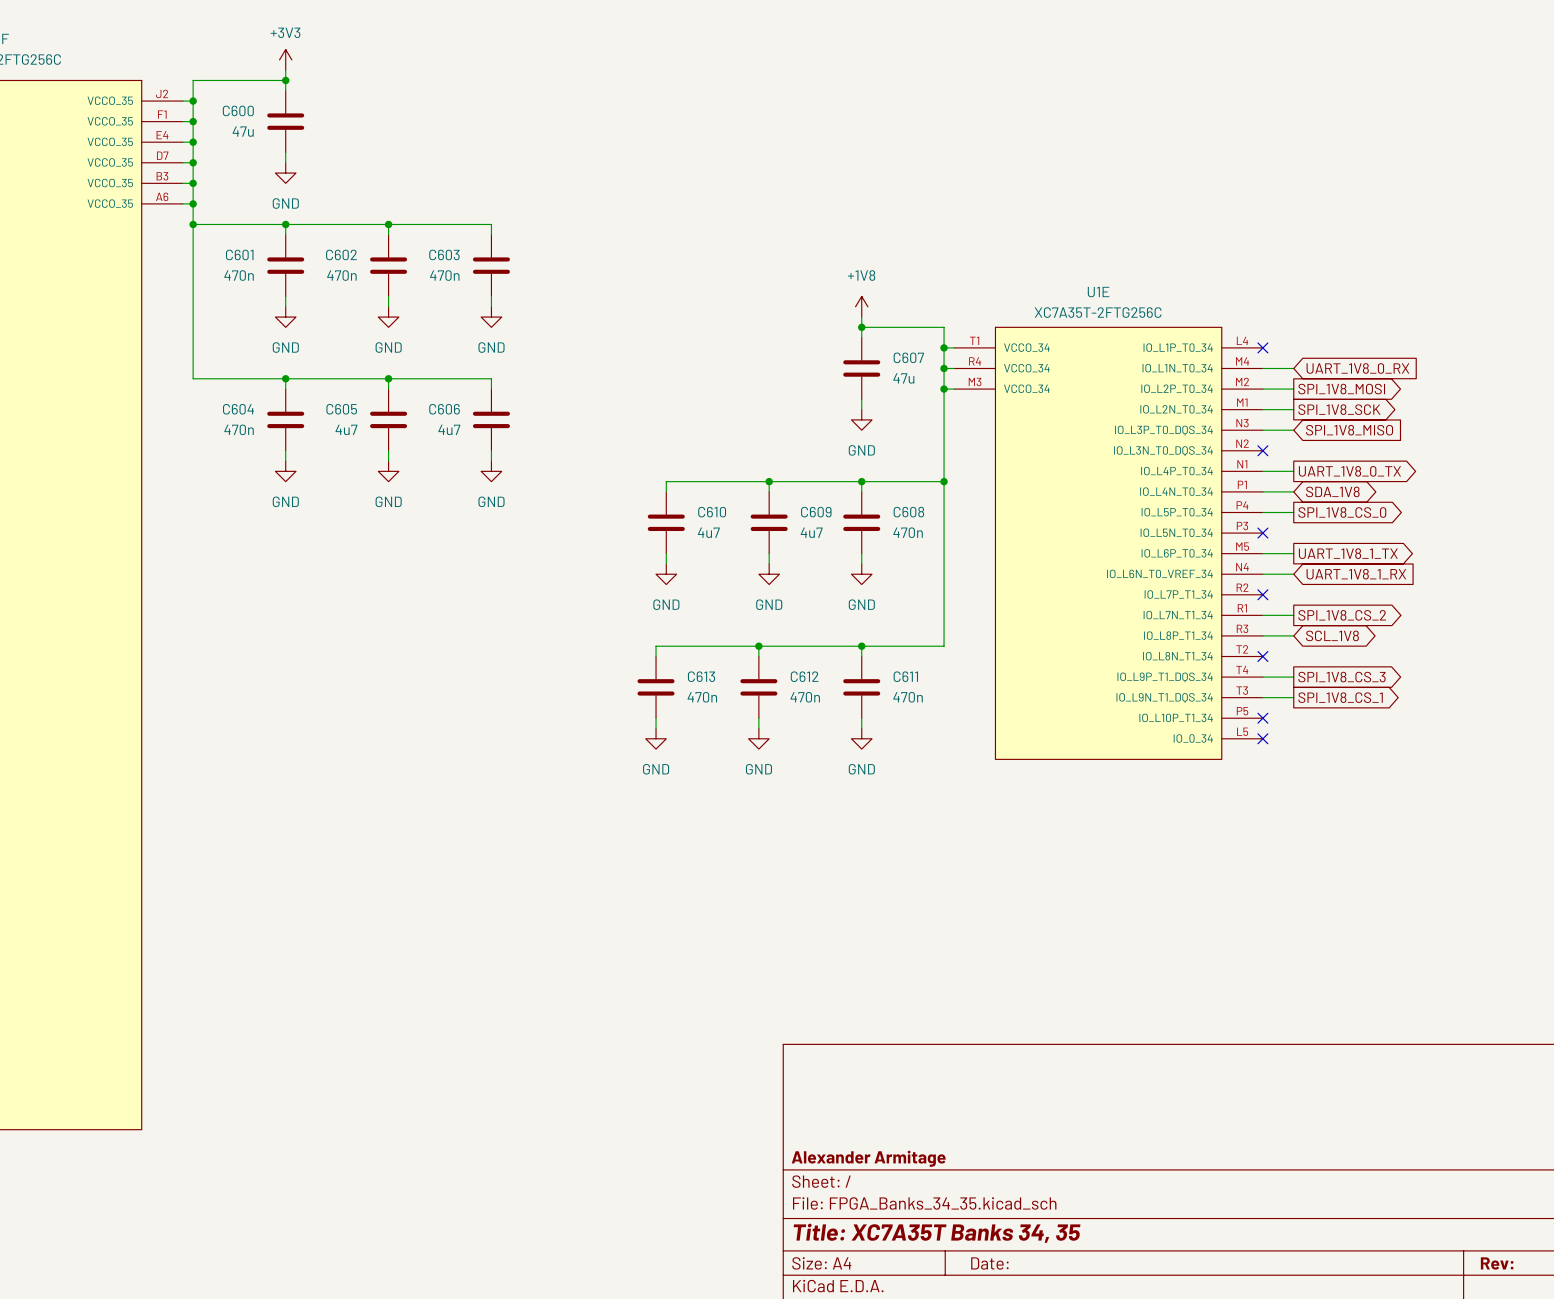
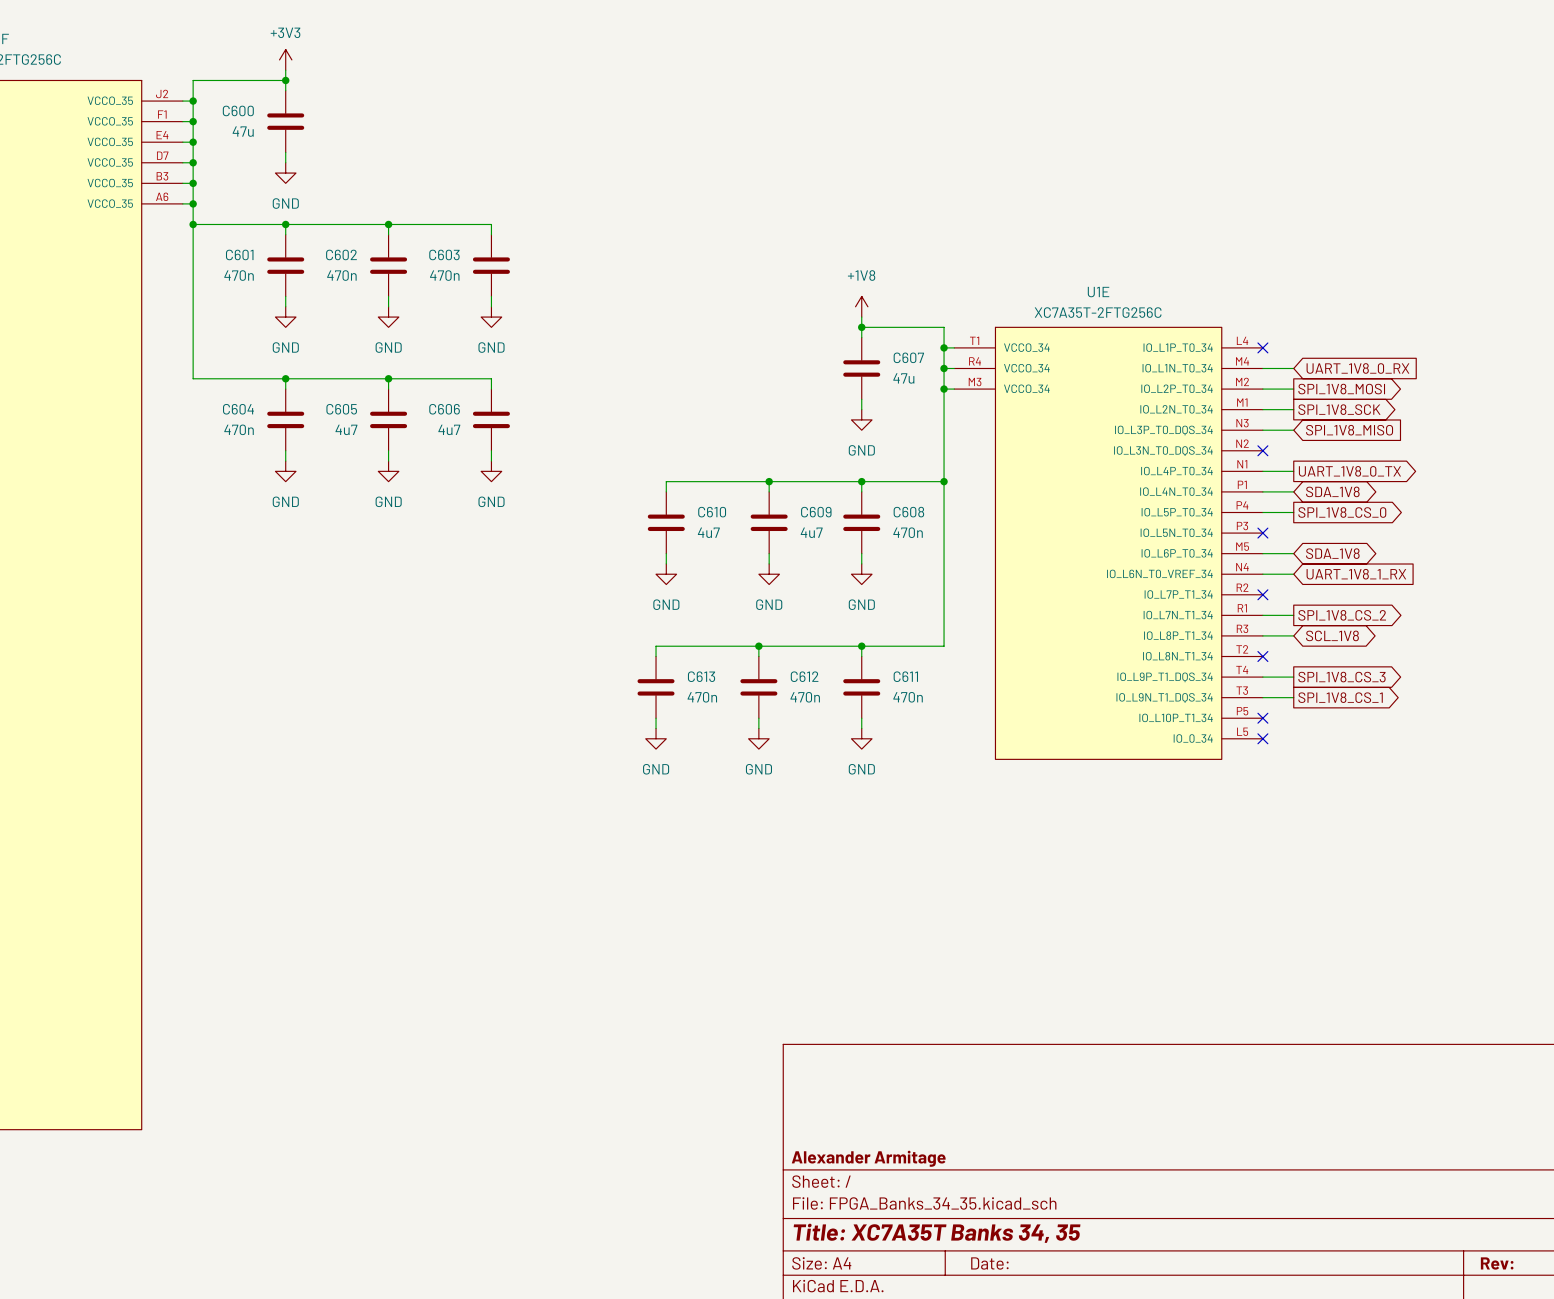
global label shape: output (1348, 553) -> bidirectional (1332, 553)
global label: UART_1V8_1_TX (1348, 553) -> SDA_1V8 (1332, 553)

